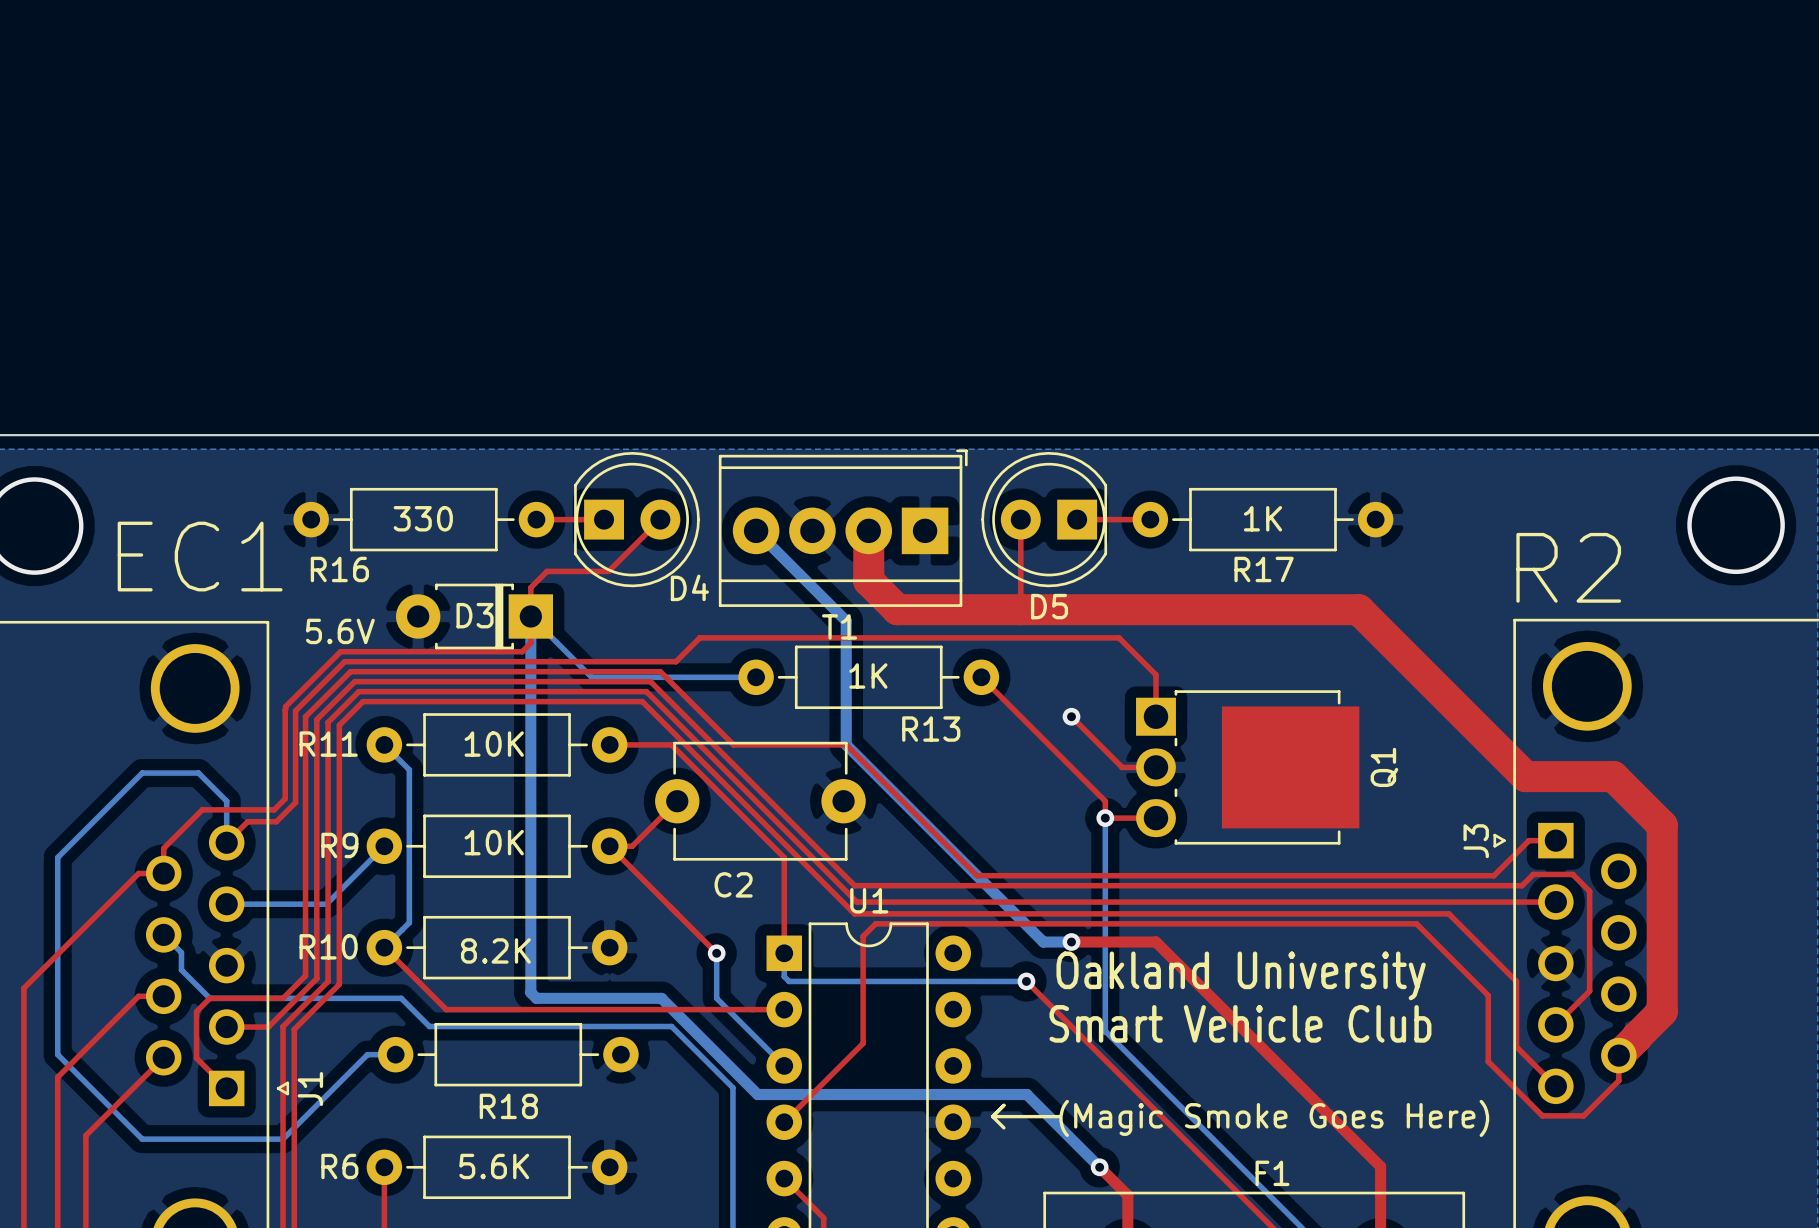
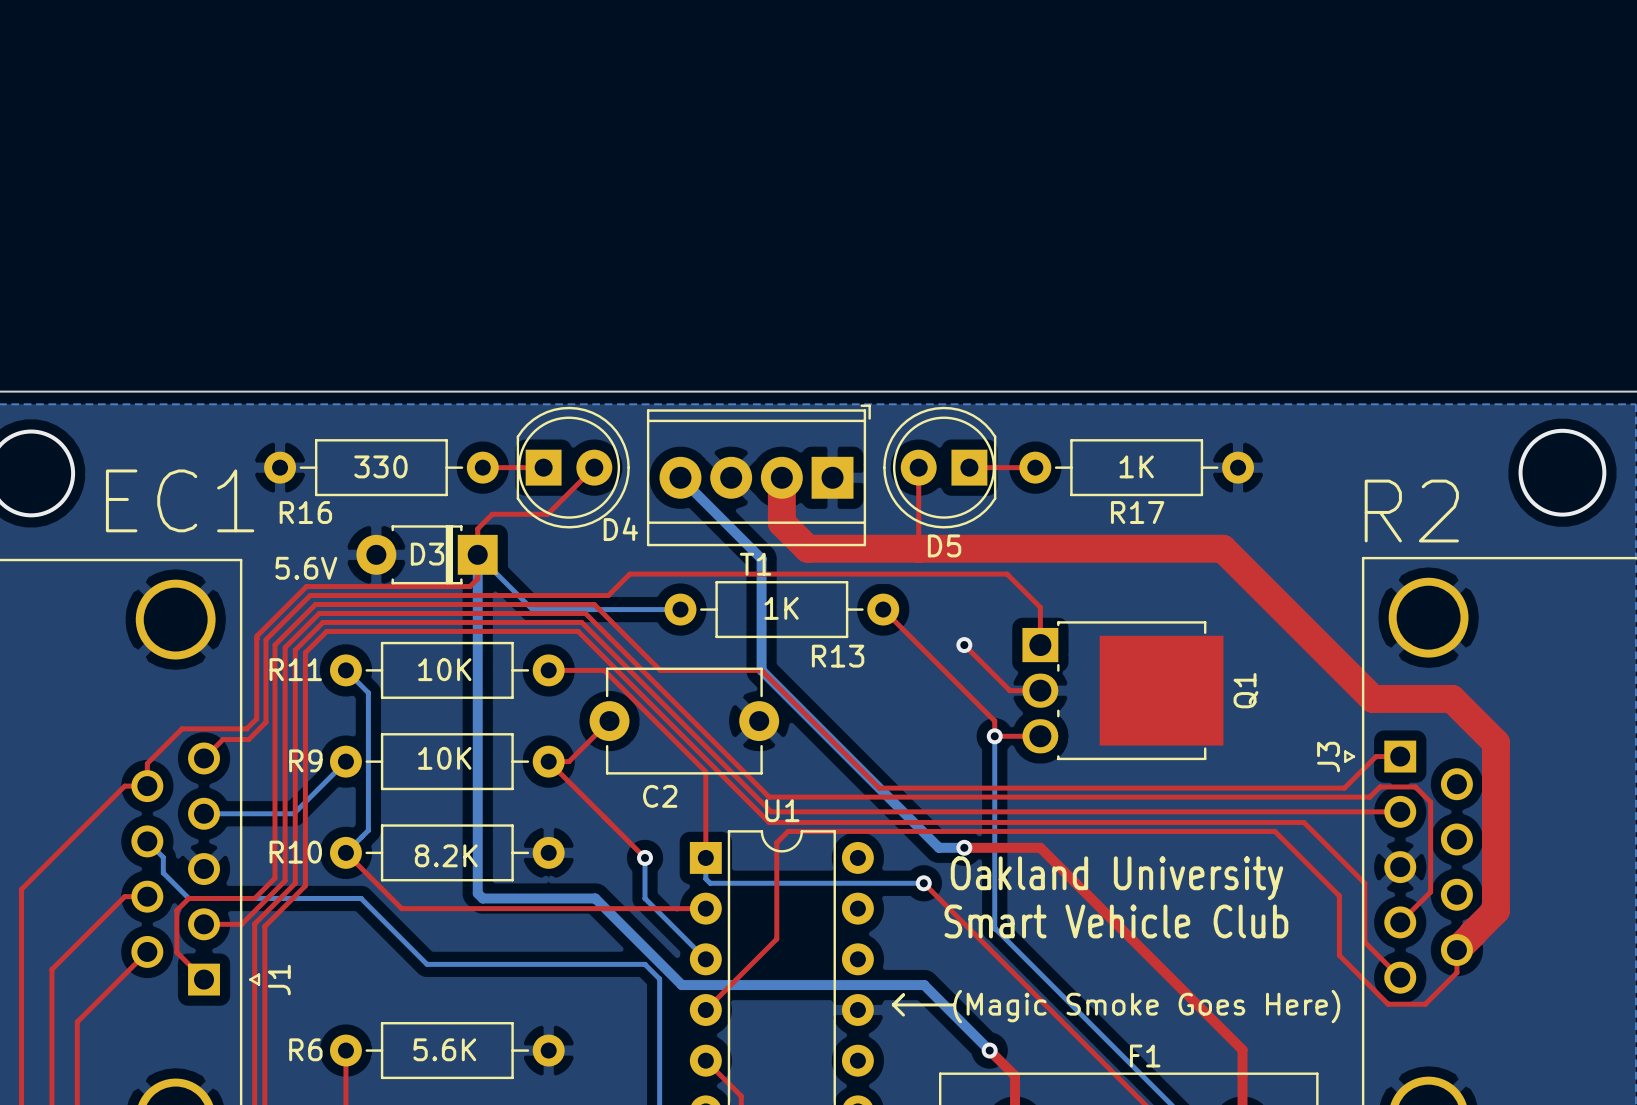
bottom track: (226, 842) (226, 801) (198, 773) (142, 773) (57, 857) (57, 1054) (142, 1139) (283, 1139) (367, 1054) (395, 1054) -> none
bottom track: (429, 1026) (671, 1026) (716, 1071) -> (386, 923) (427, 964) (645, 964)
R18: (508, 1054) -> none

